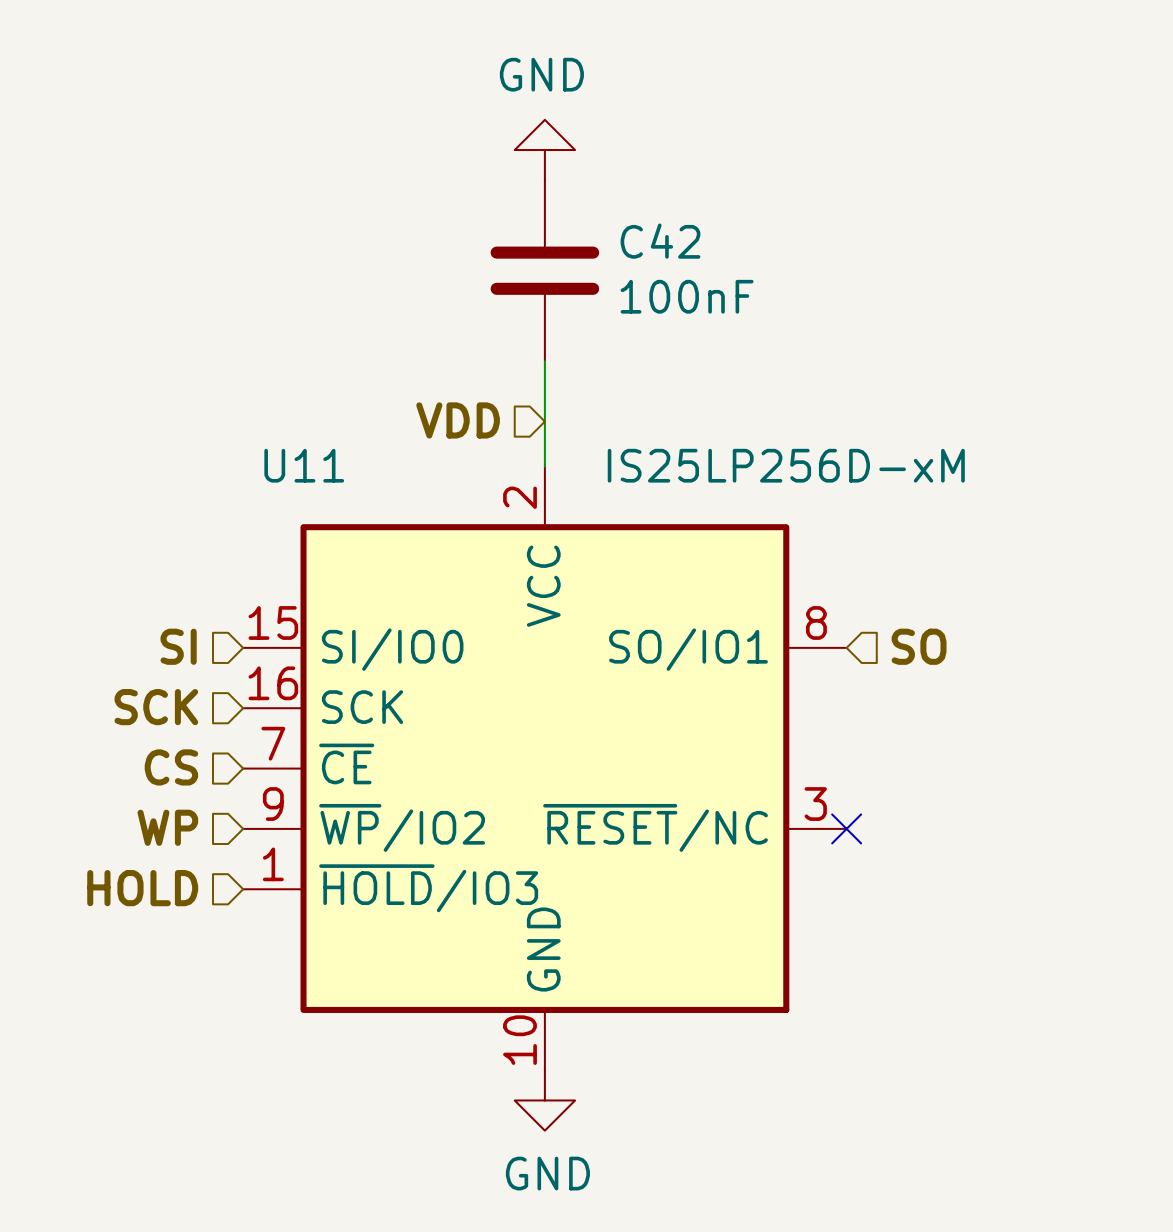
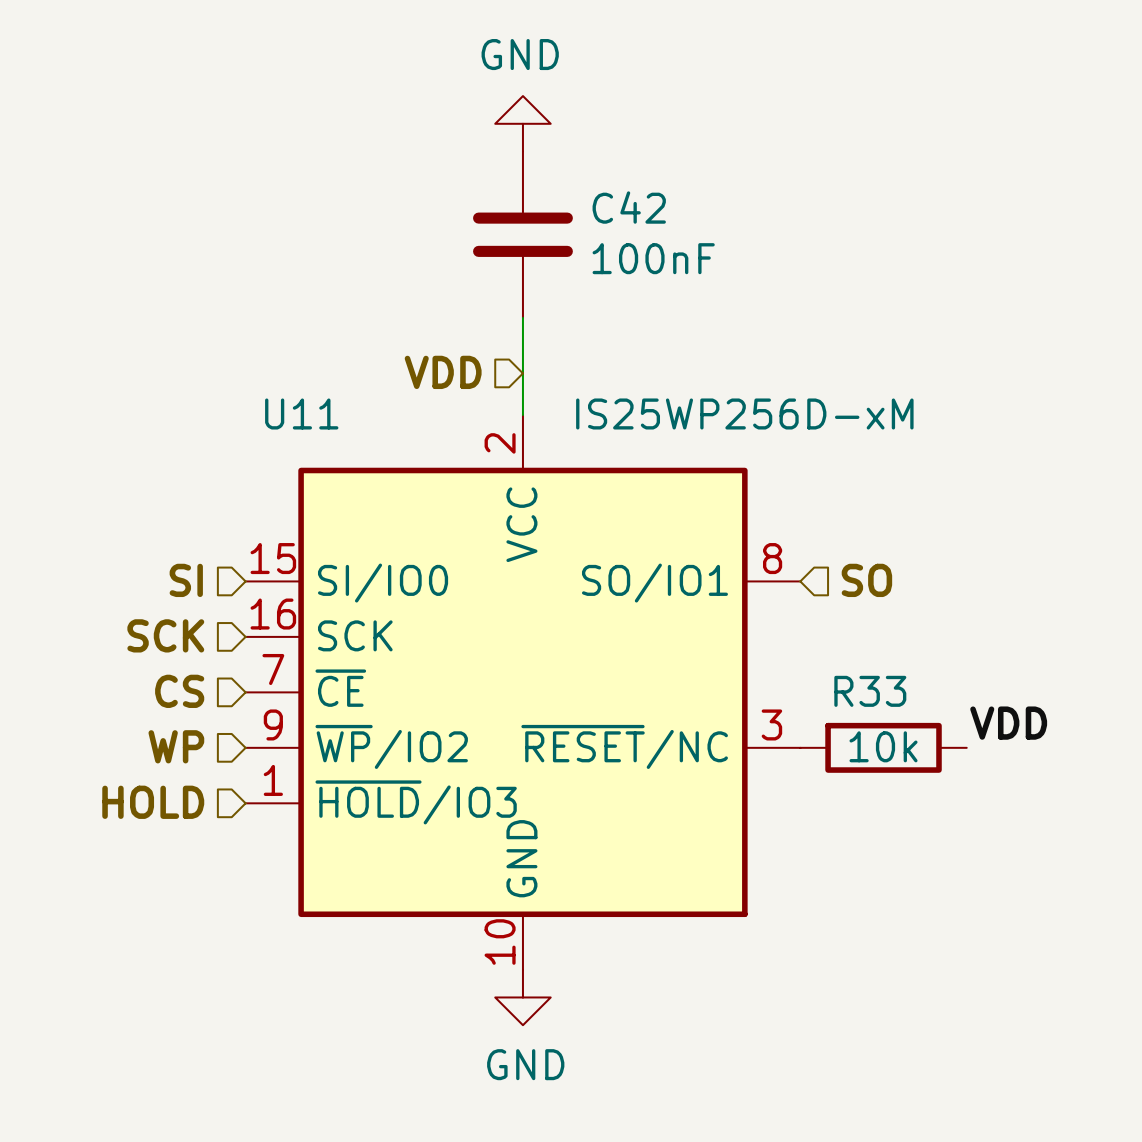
U11 value: IS25LP256D-xM (786, 465) -> IS25WP256D-xM (744, 413)
label: none -> VDD (1008, 723)
no-connect mark: (846, 828) -> none
R33: none -> 10k (883, 747)

